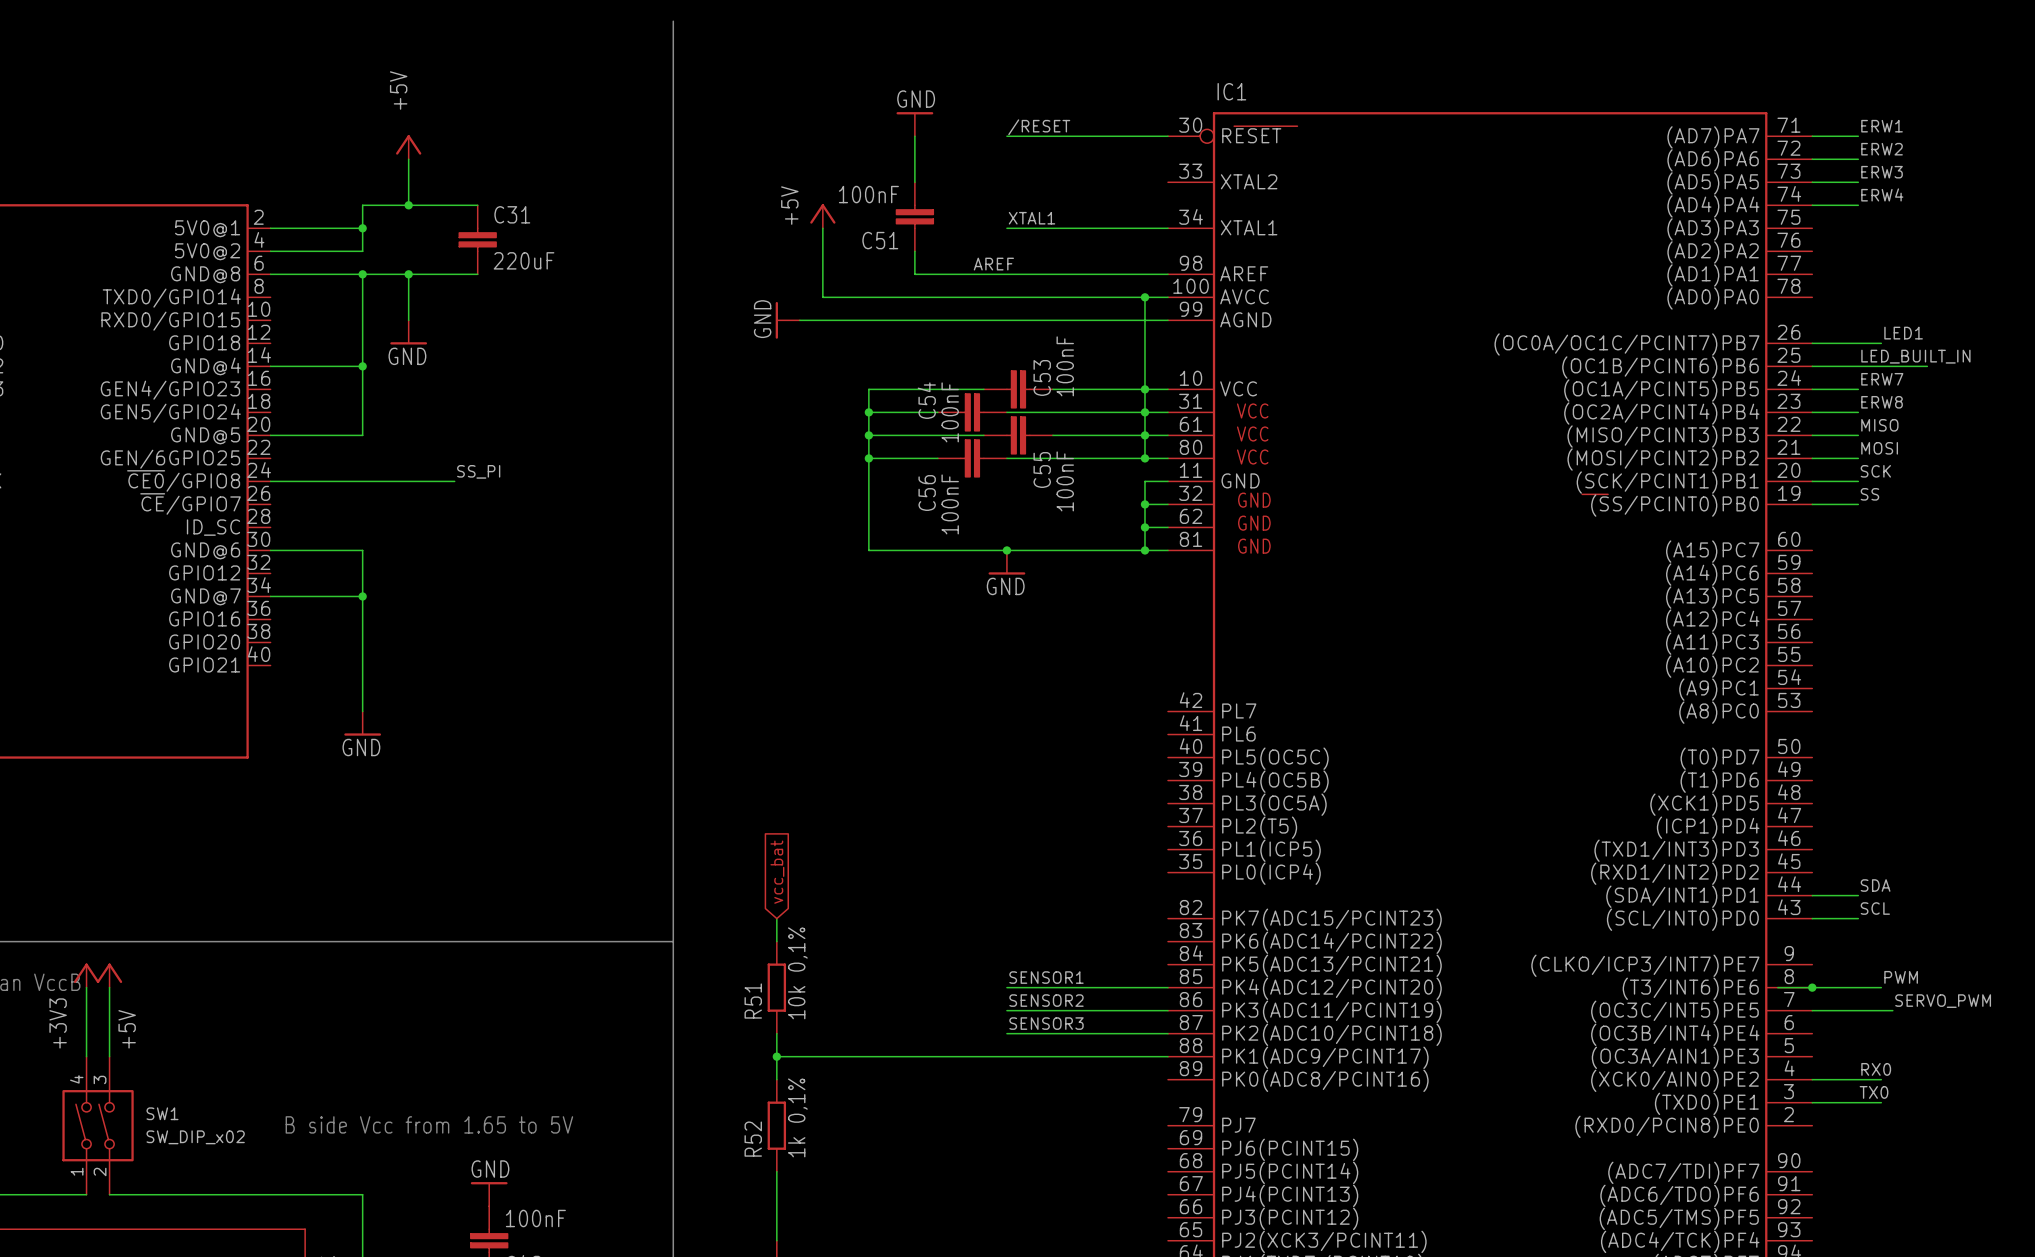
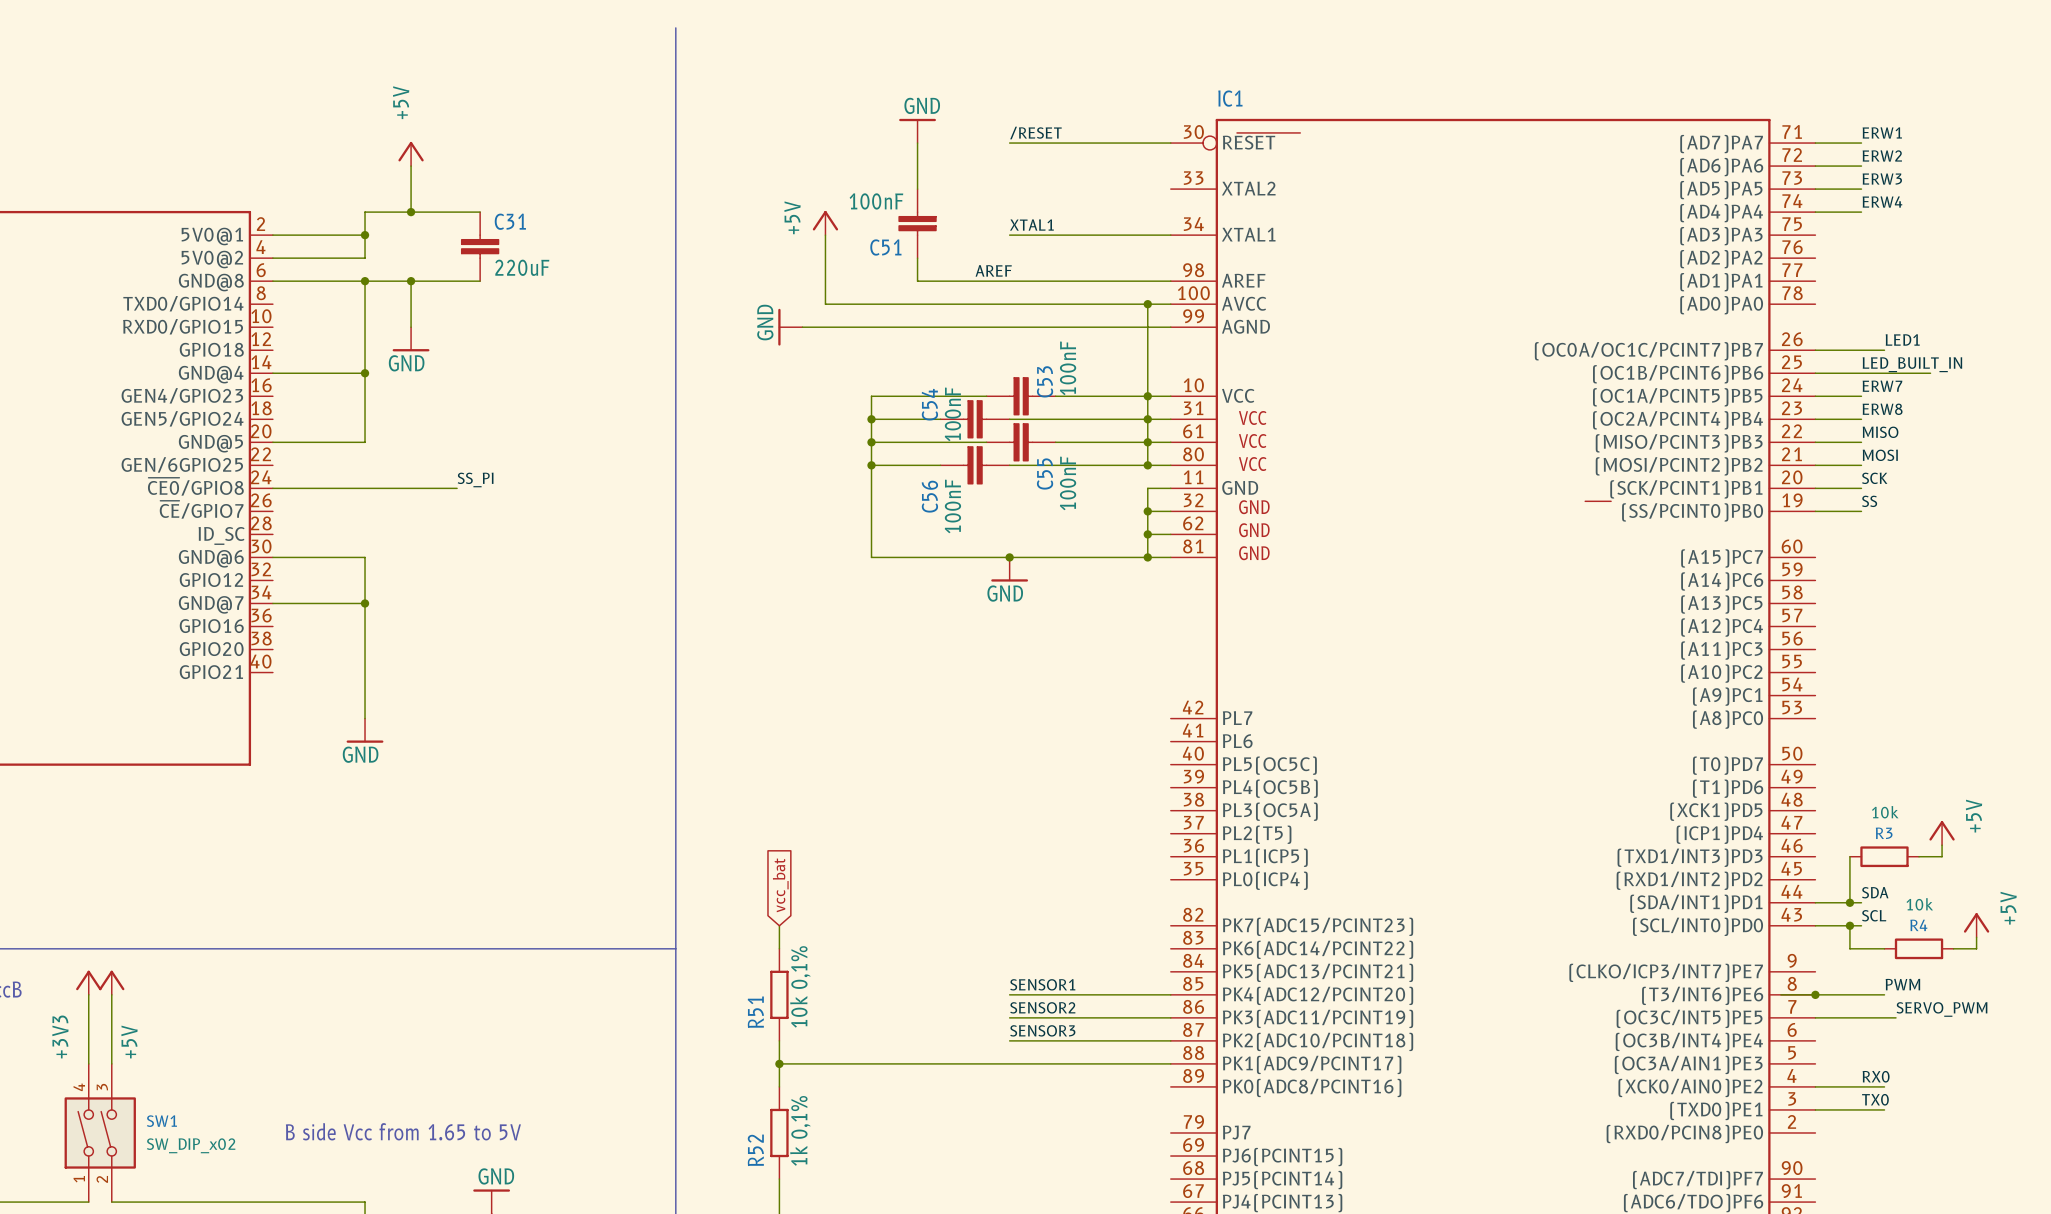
power symbol: none -> +5V (1942, 833)
wire: none -> (1942, 845) (1942, 856) (1919, 856)
wire: none -> (1849, 856) (1849, 902)
R3: none -> 10k (1884, 856)
junction: none -> (1849, 902)
wire: none -> (1849, 925) (1849, 948) (1884, 948)
junction: none -> (1849, 925)
power symbol: none -> +5V (1976, 925)
wire: none -> (1976, 937) (1976, 948) (1953, 948)
R4: none -> 10k (1919, 948)

